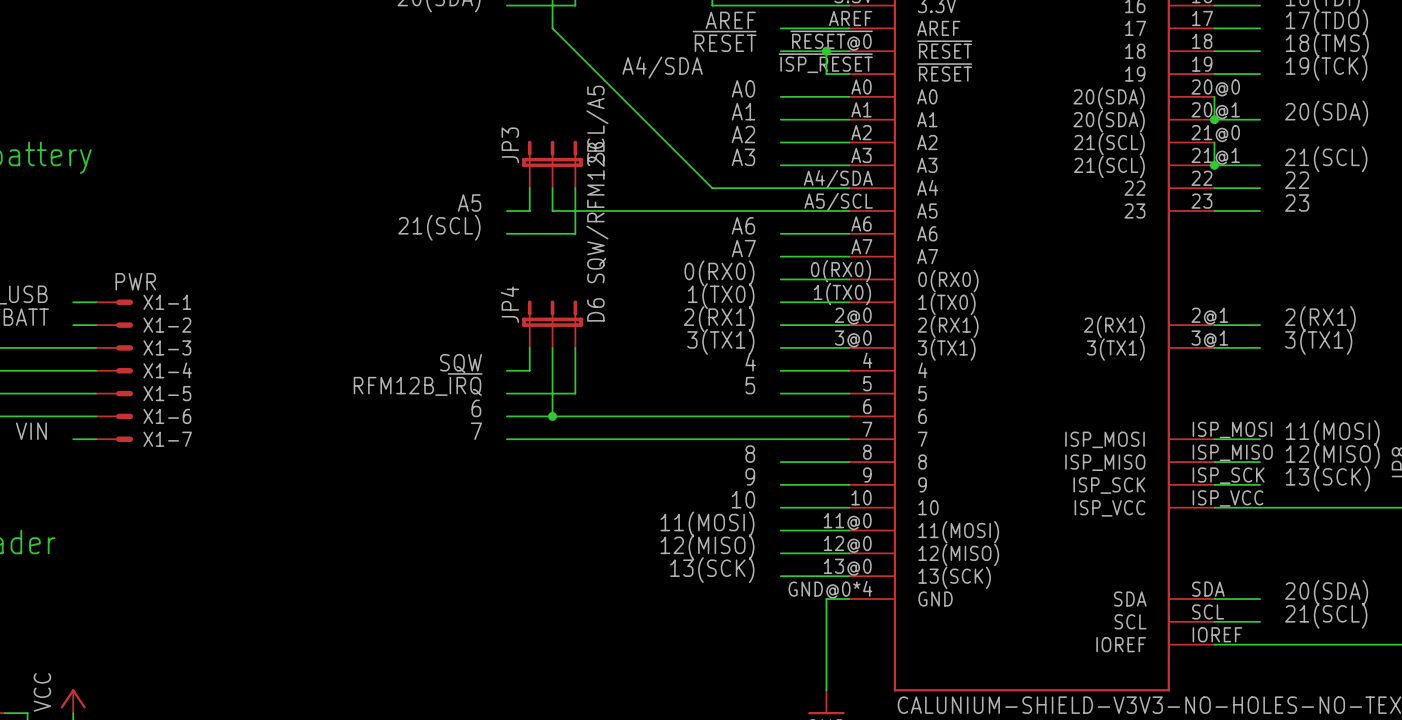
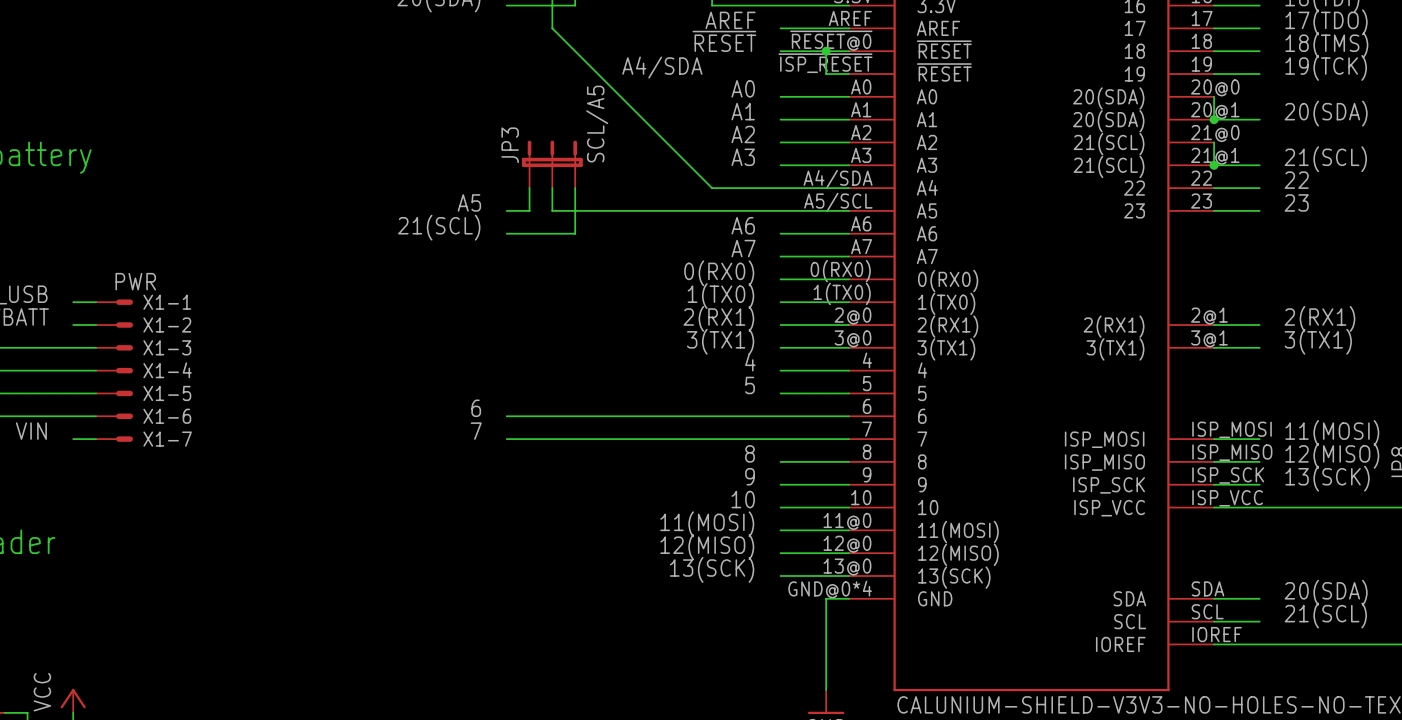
JP4: D6 SQW/RFM12B (552, 324) -> none
wire: (529, 347) (529, 370) (506, 370) -> none
wire: (552, 347) (552, 416) -> none
wire: (575, 347) (575, 393) (506, 393) -> none
label: SQW (460, 363) -> none
label: RFM12B_~{IRQ} (418, 384) -> none
junction: (552, 416) -> none

